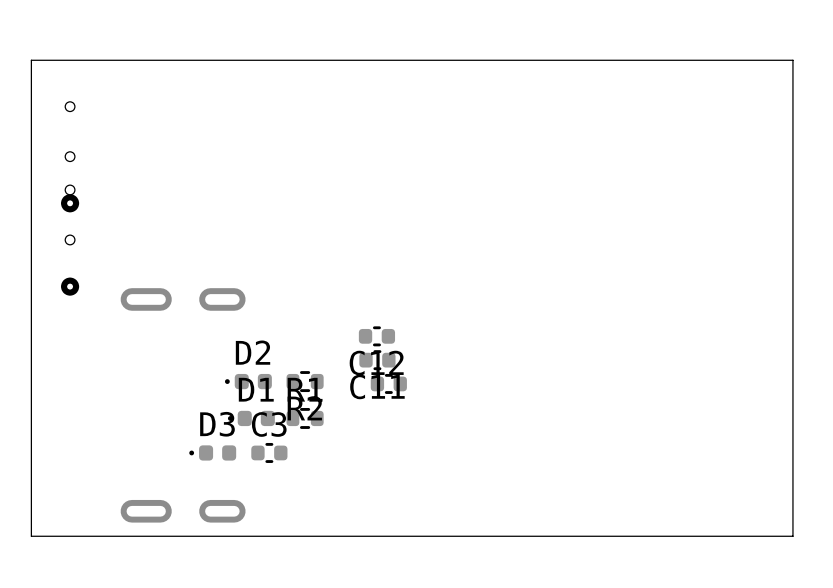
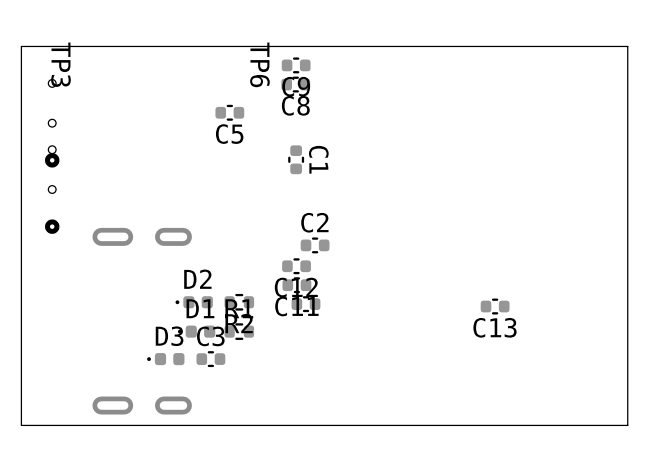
TP3: none -> (60, 64)
TP6: none -> (259, 64)
C9: none -> (296, 65)
C8: none -> (295, 84)
C5: none -> (229, 112)
C1: none -> (296, 159)
C2: none -> (315, 245)
C13: none -> (495, 306)

